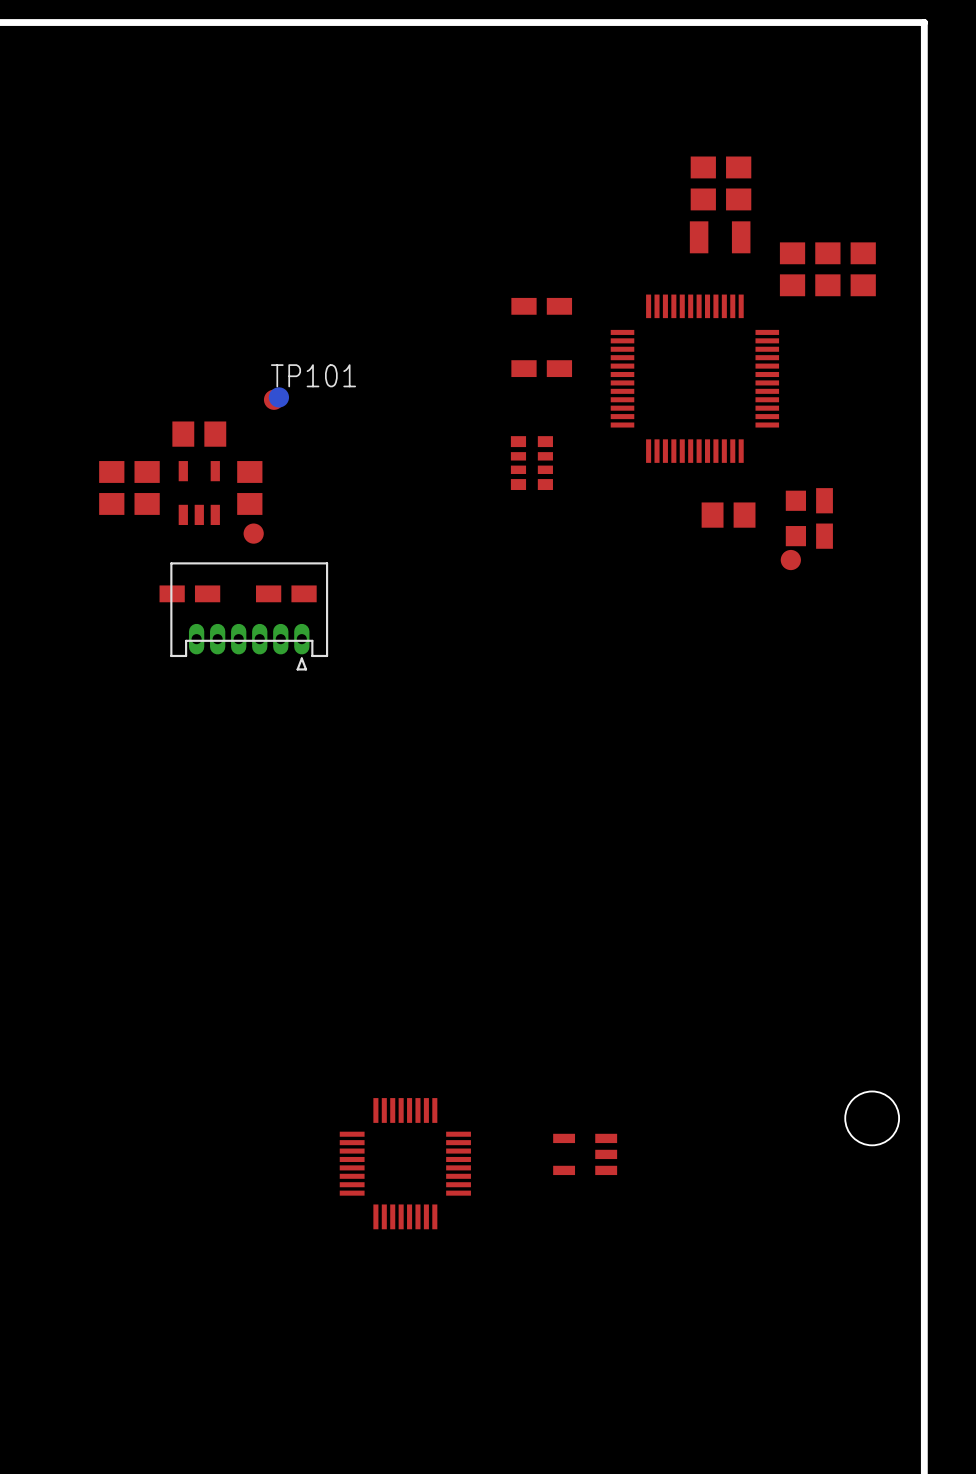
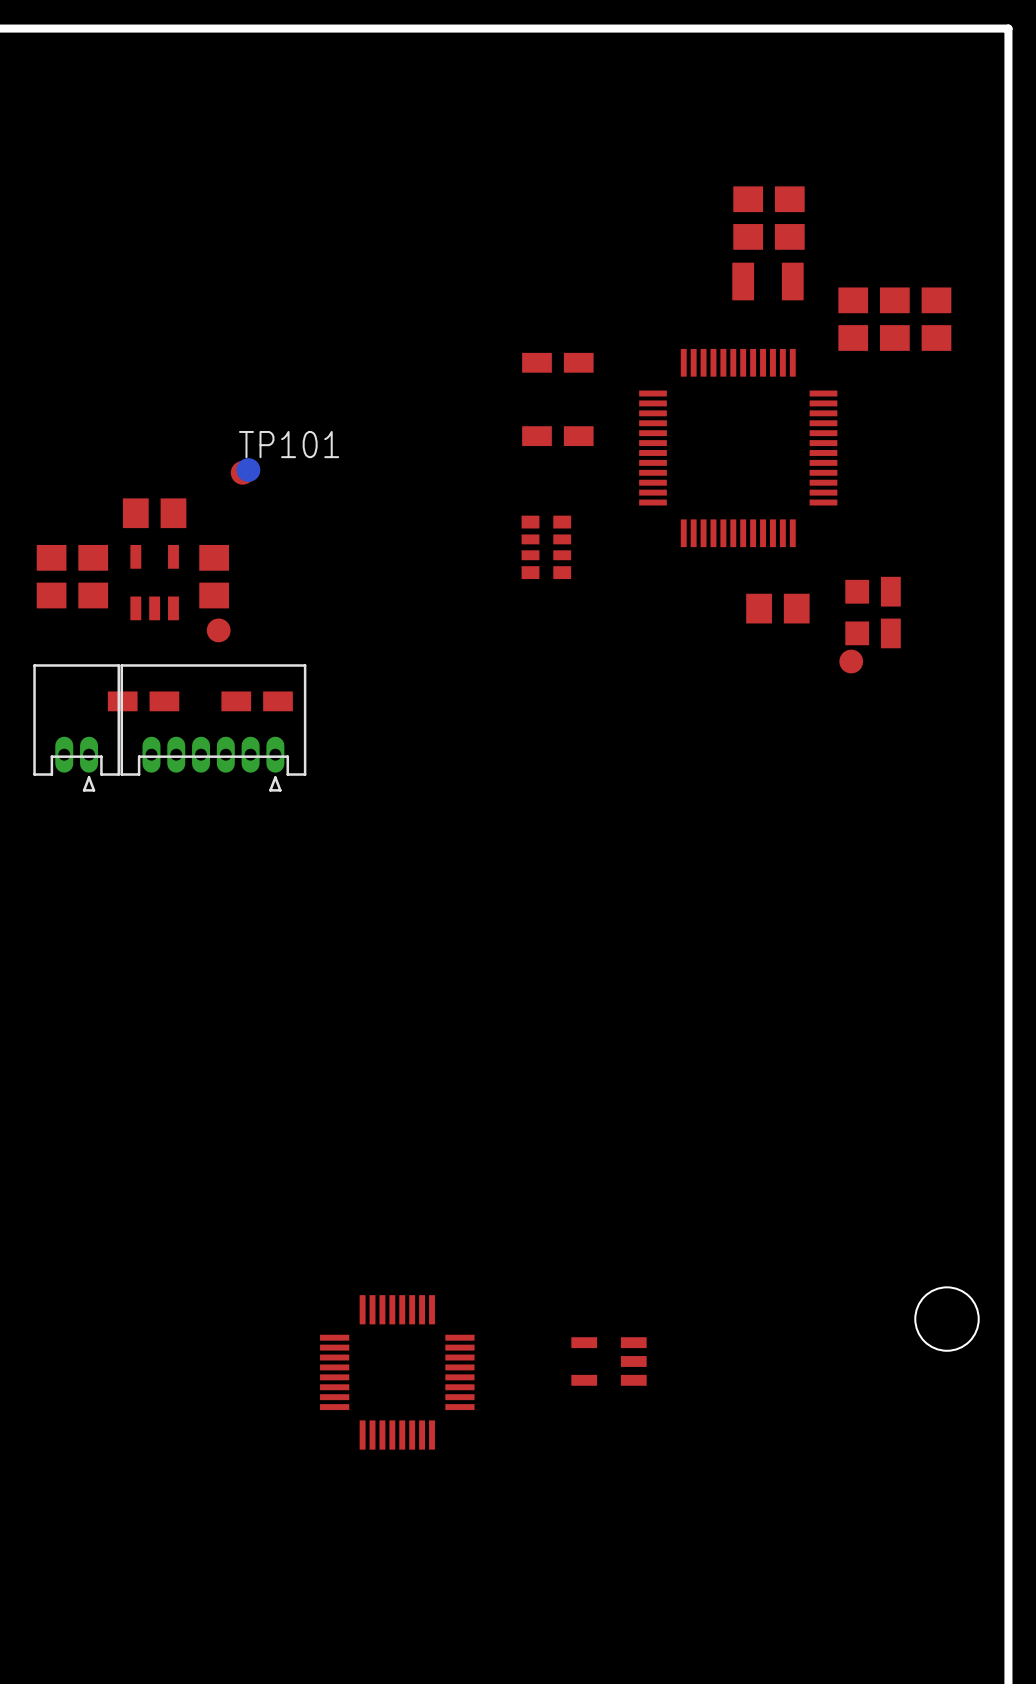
part: none -> (76, 727)

